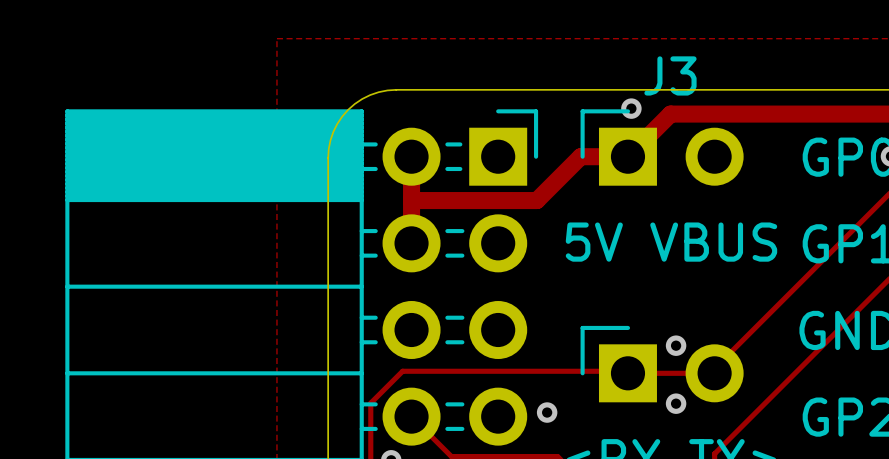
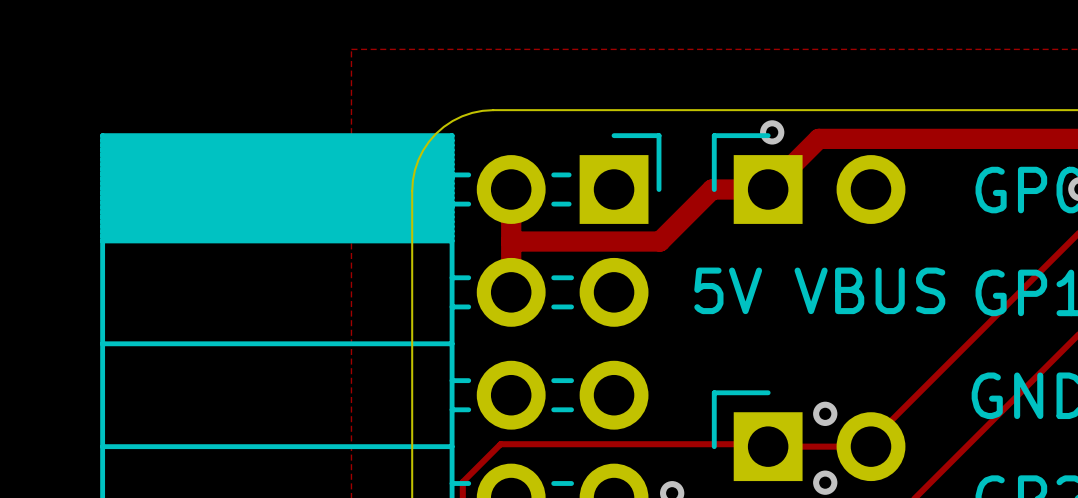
J3 name: J3 (670, 75) -> none

